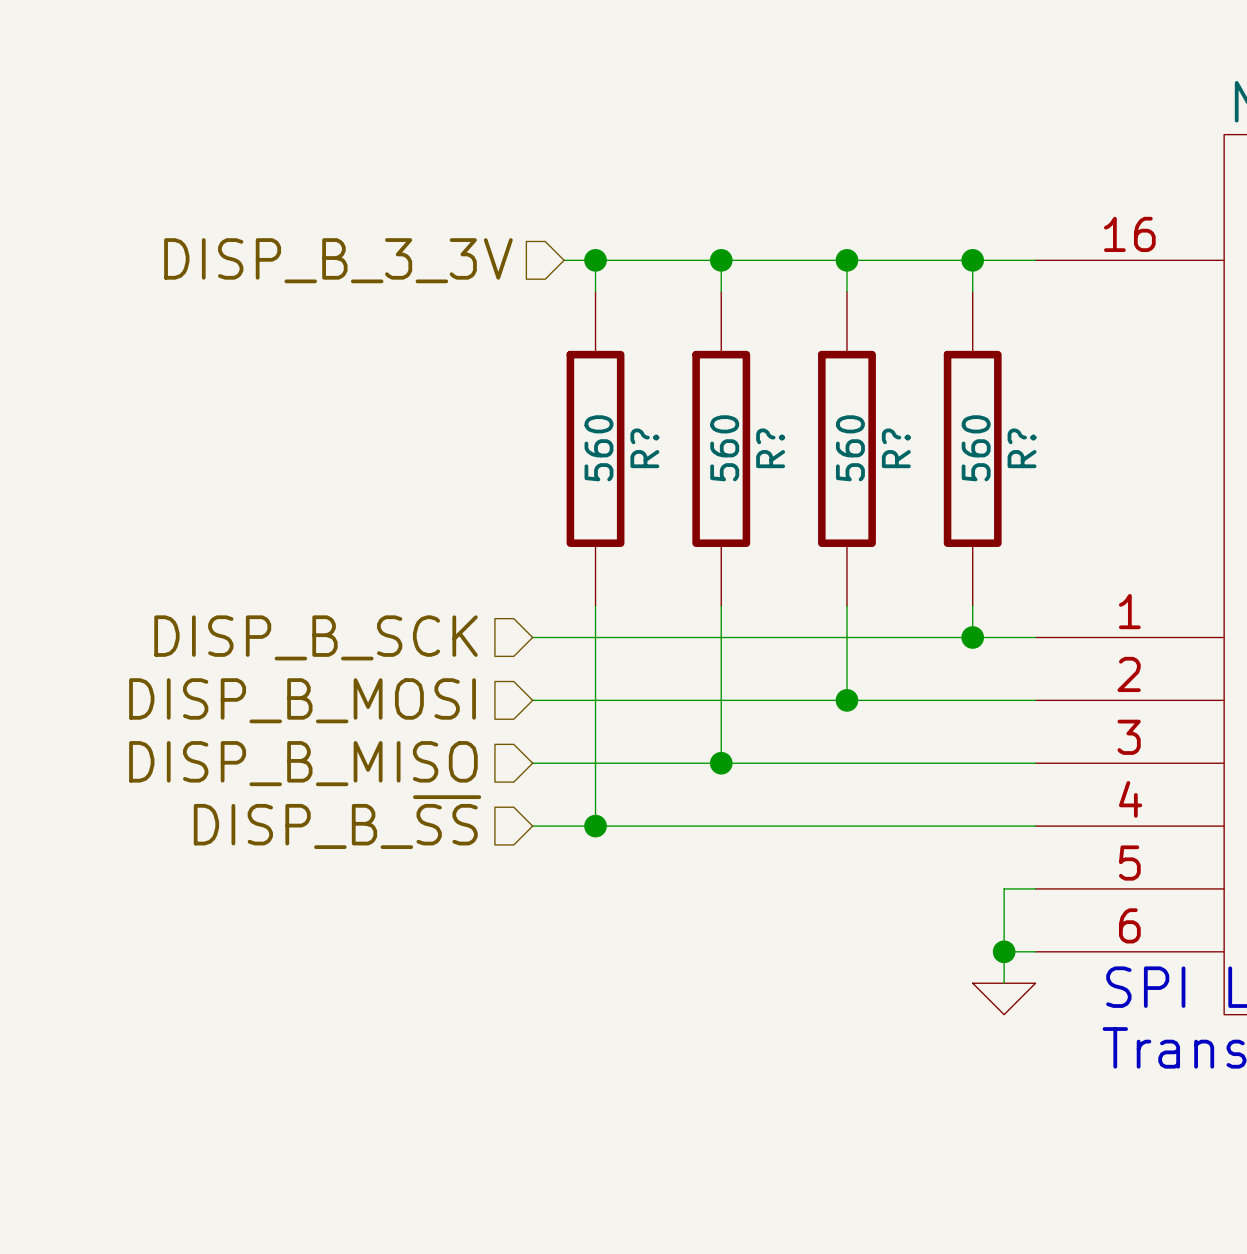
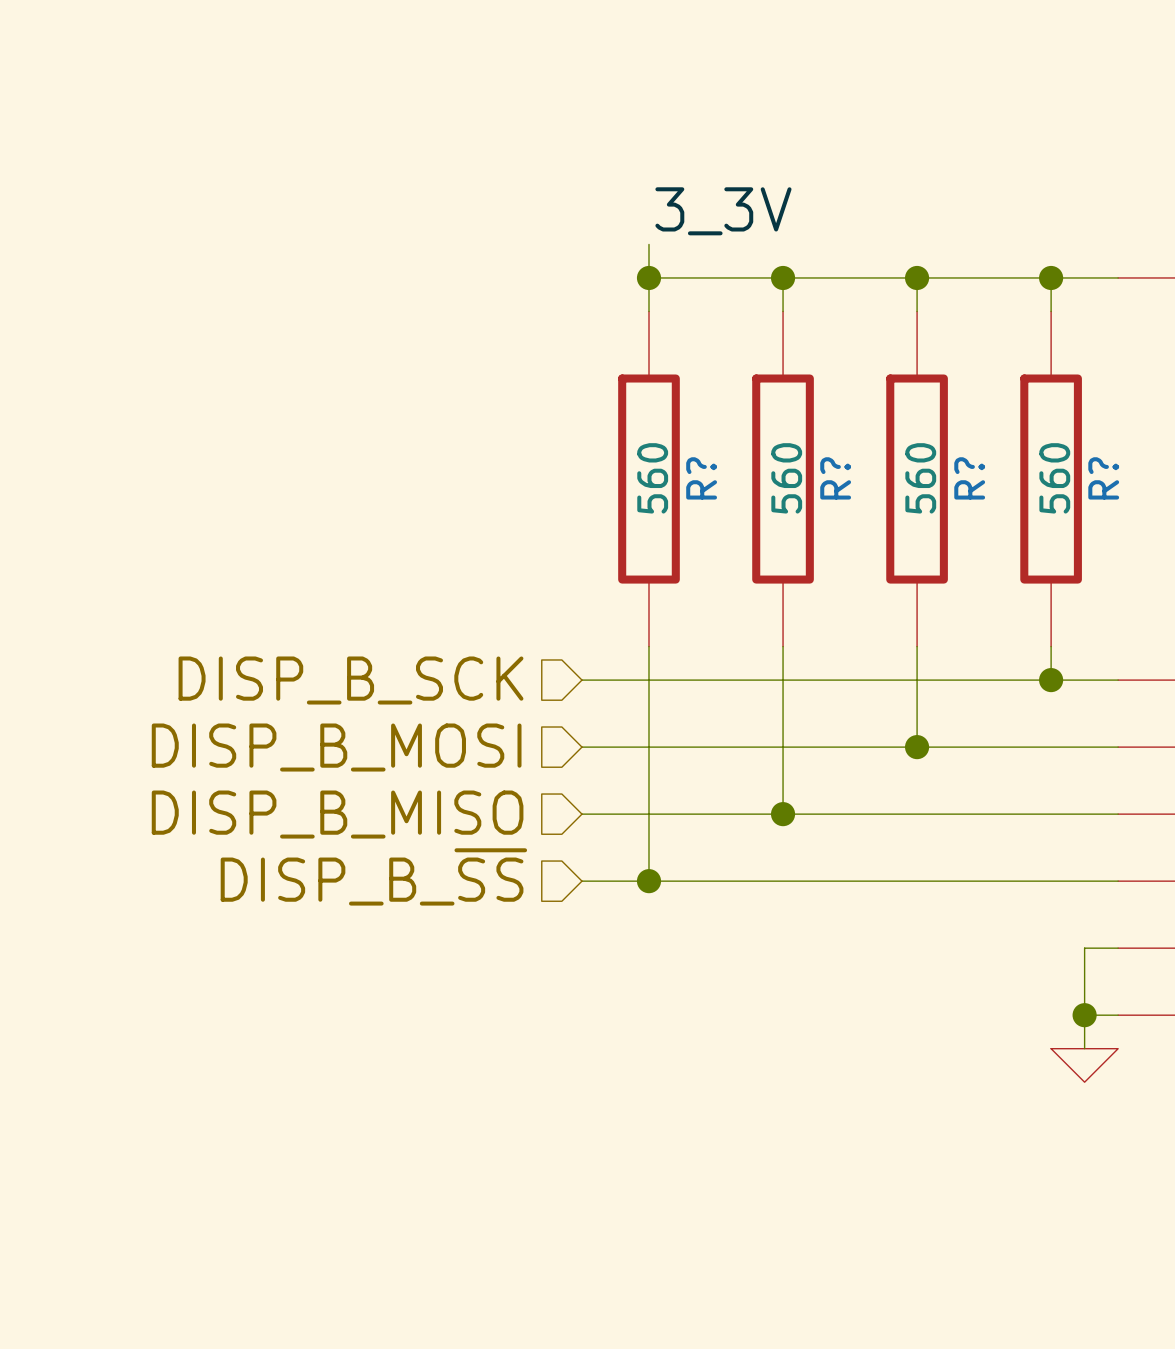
label: none -> 3_3V (723, 211)
hierarchical label: DISP_B_3_3V (338, 260) -> none
wire: (564, 260) (595, 260) -> (649, 244) (649, 277)

